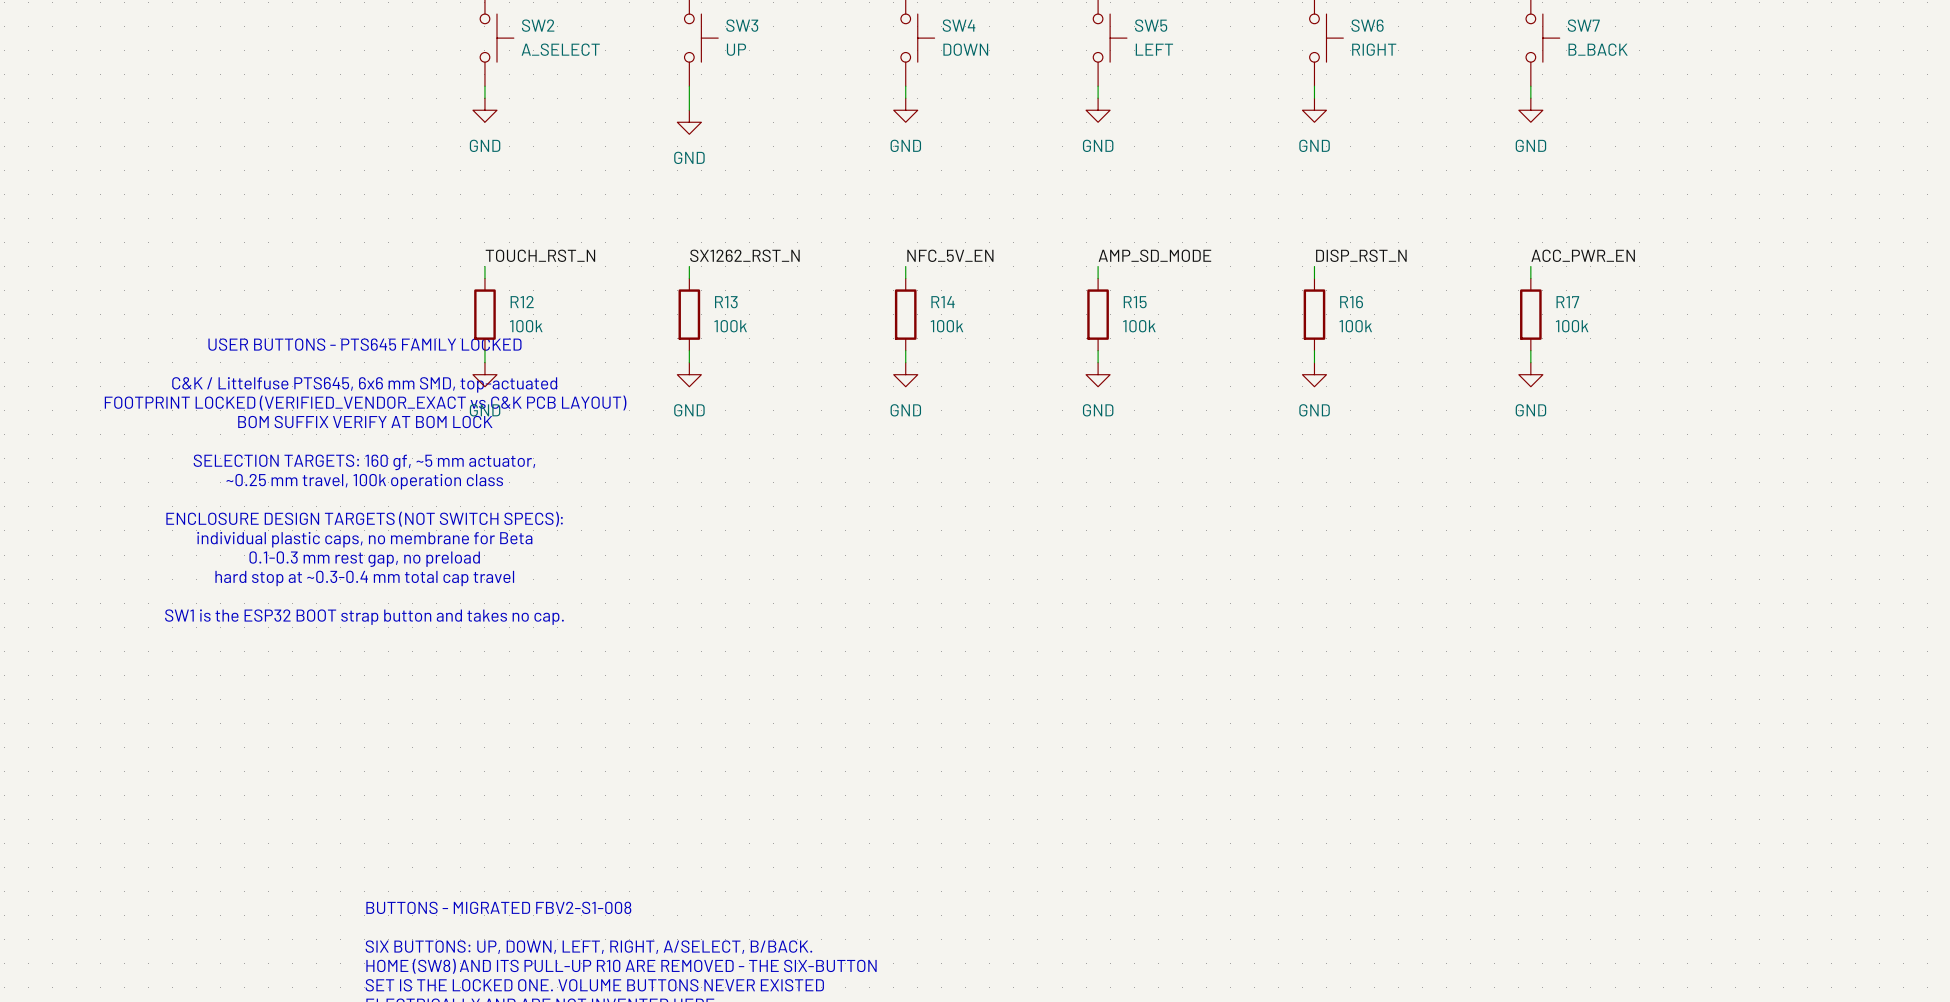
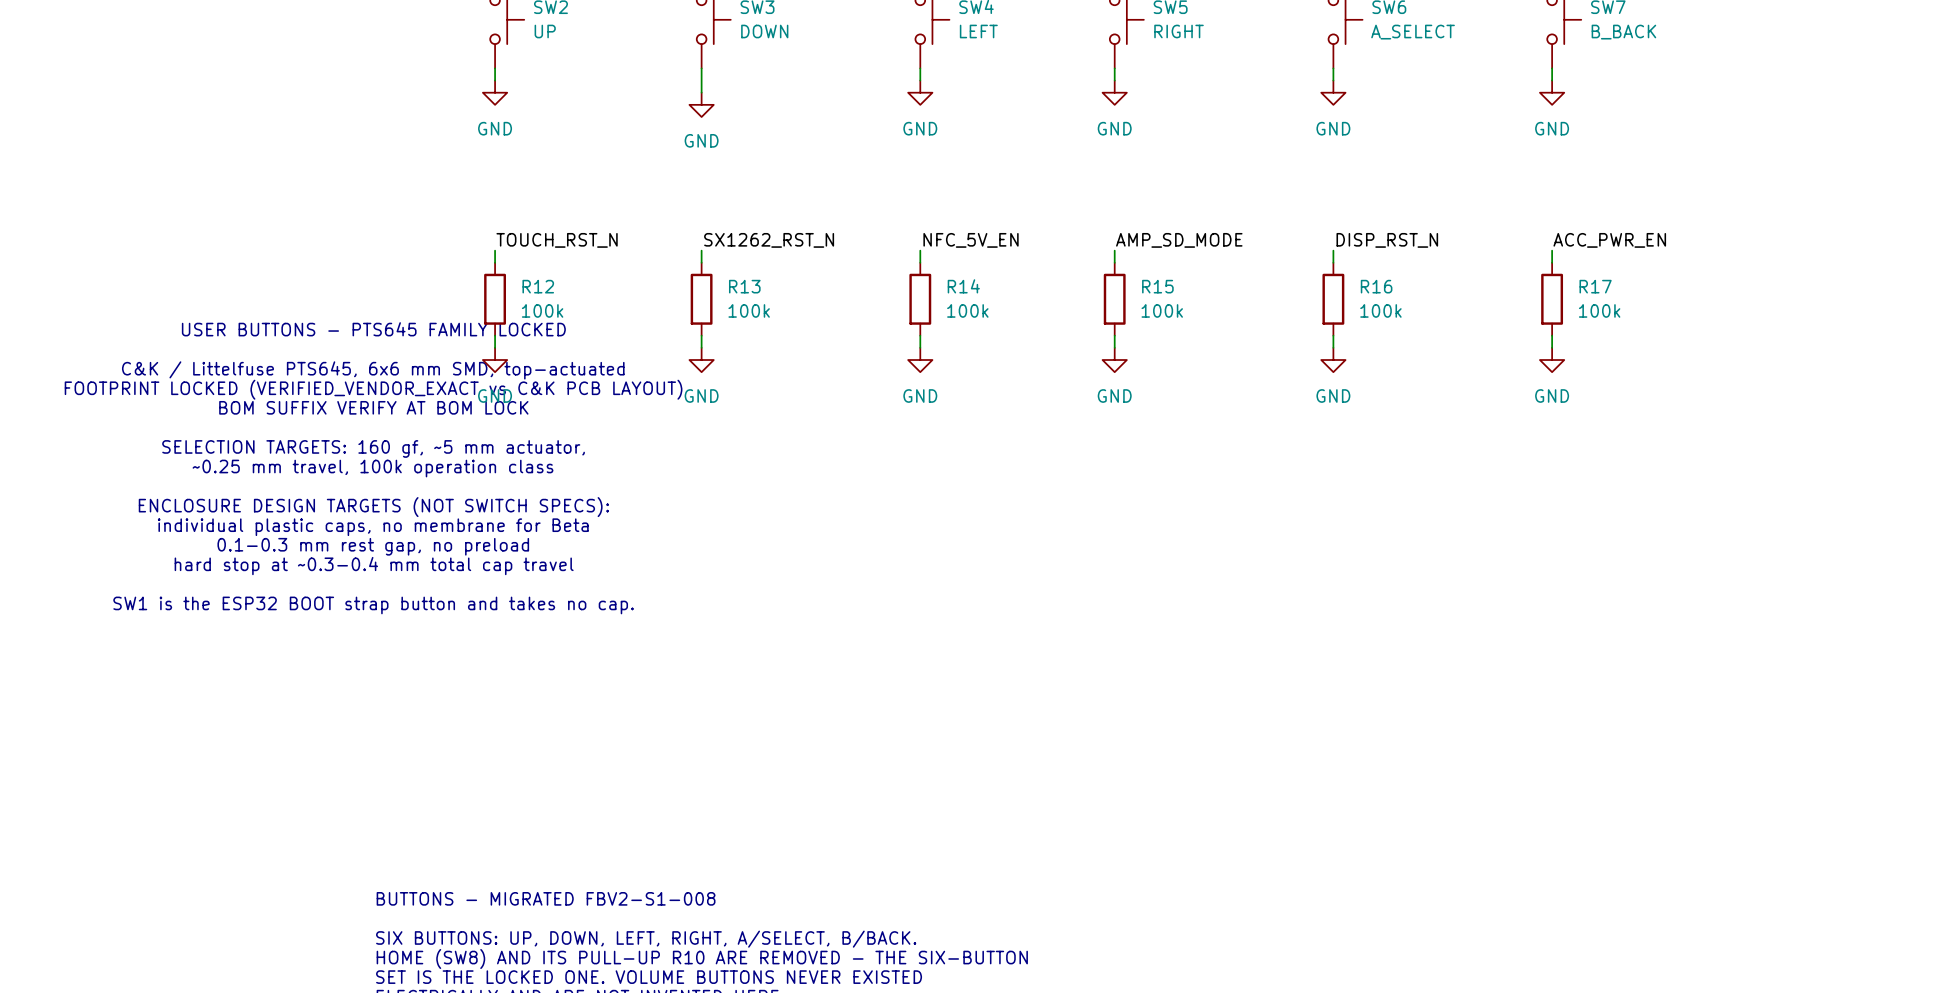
SW2 value: A_SELECT (560, 49) -> UP (545, 31)
SW3 value: UP (736, 49) -> DOWN (764, 31)
SW4 value: DOWN (965, 49) -> LEFT (978, 31)
SW5 value: LEFT (1154, 49) -> RIGHT (1179, 31)
SW6 value: RIGHT (1374, 49) -> A_SELECT (1413, 32)

